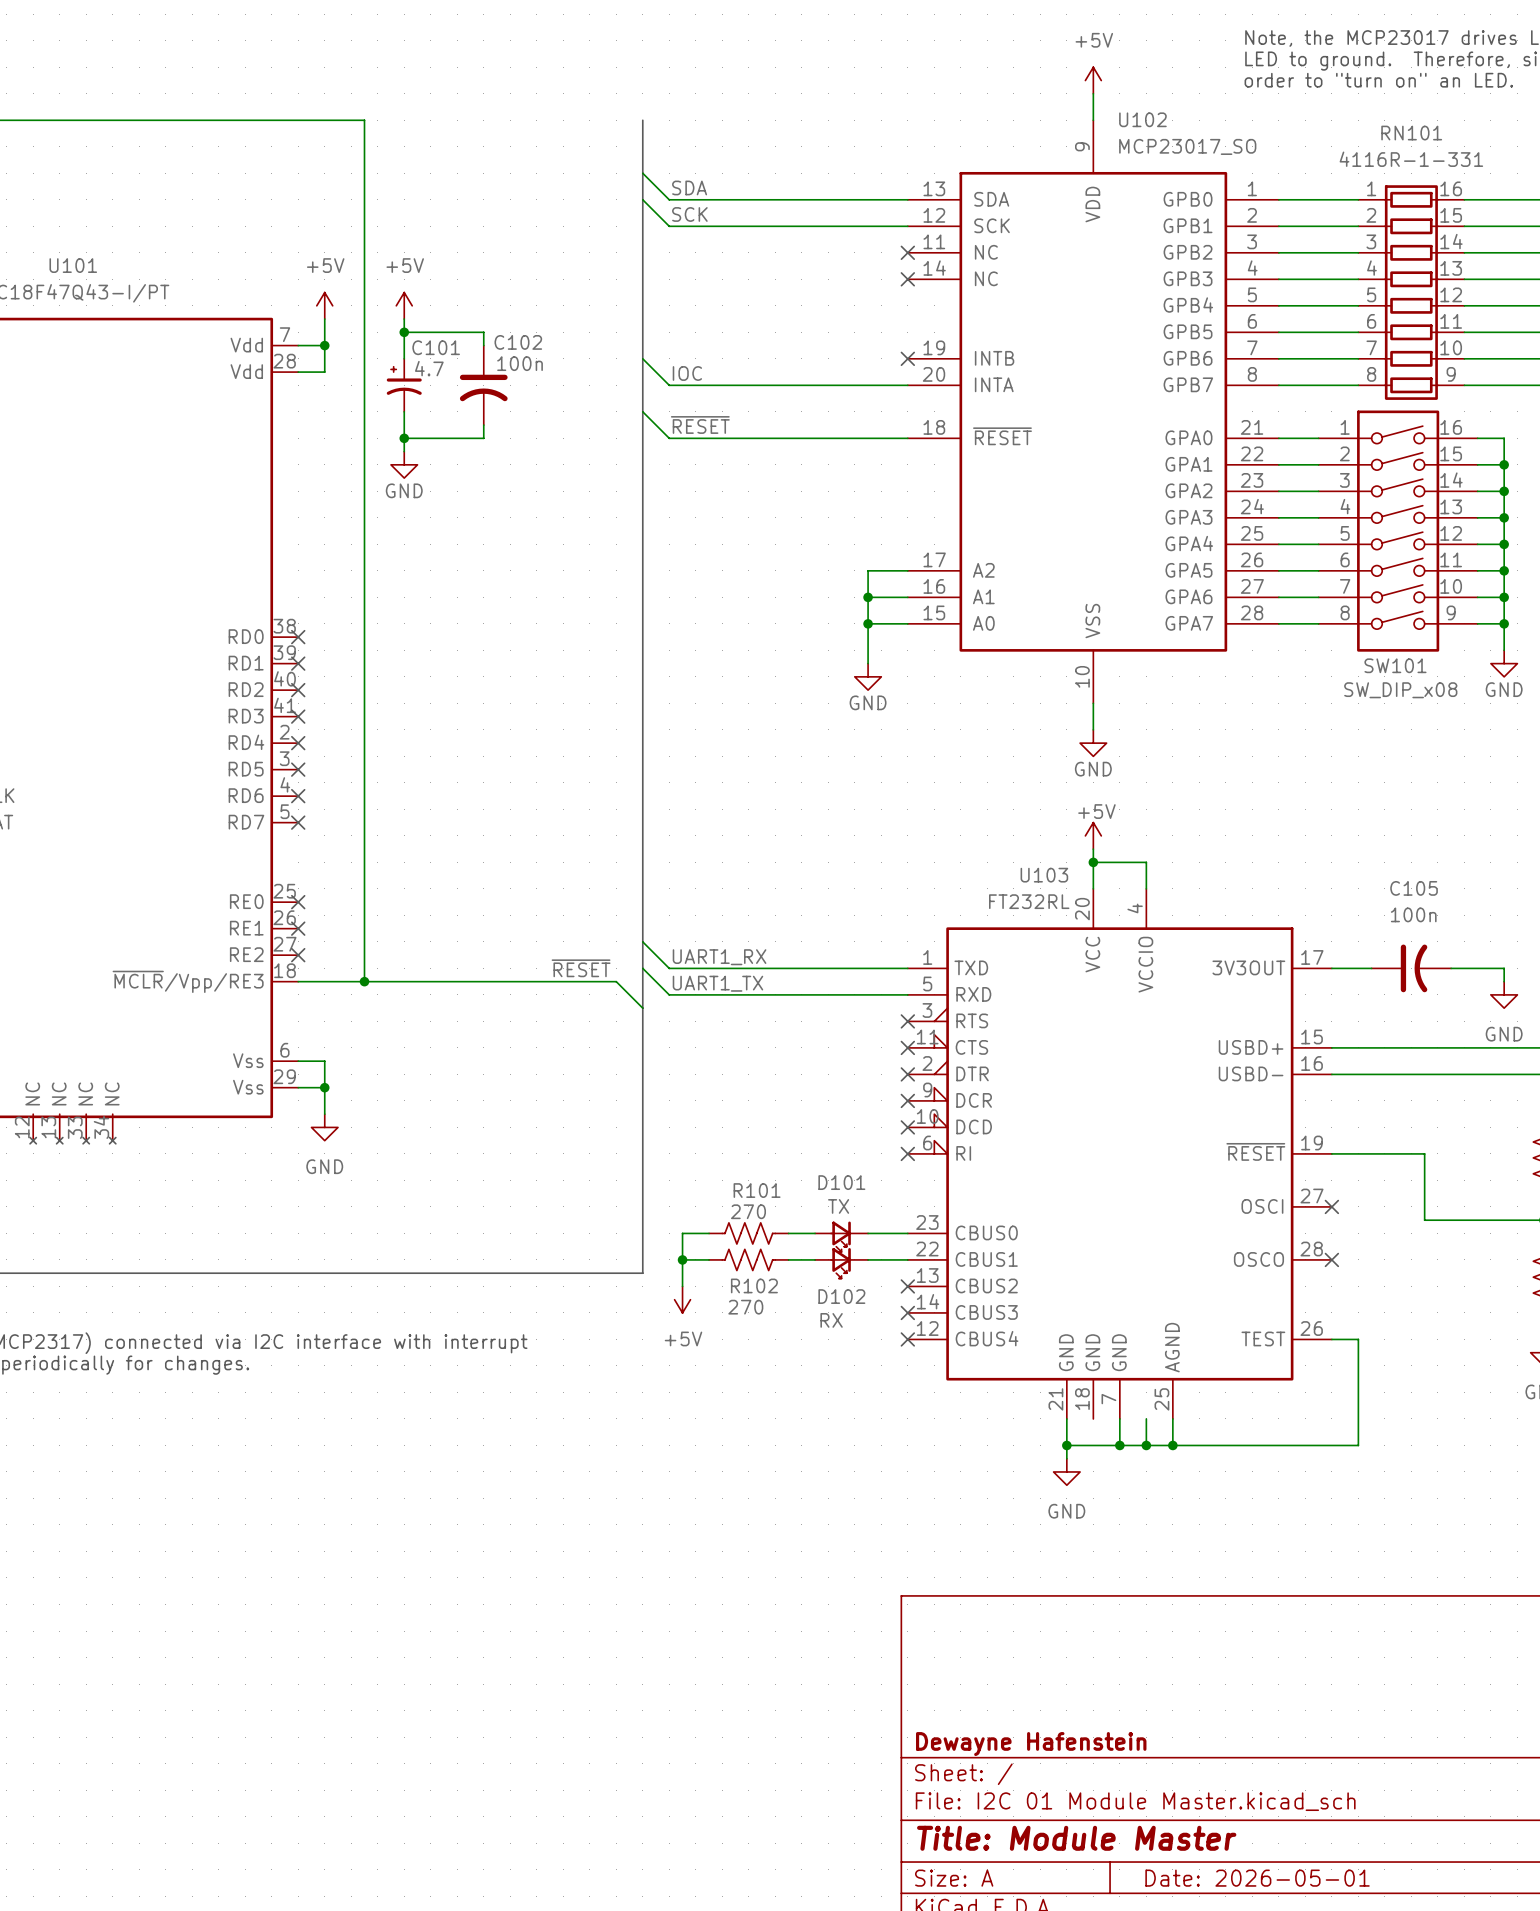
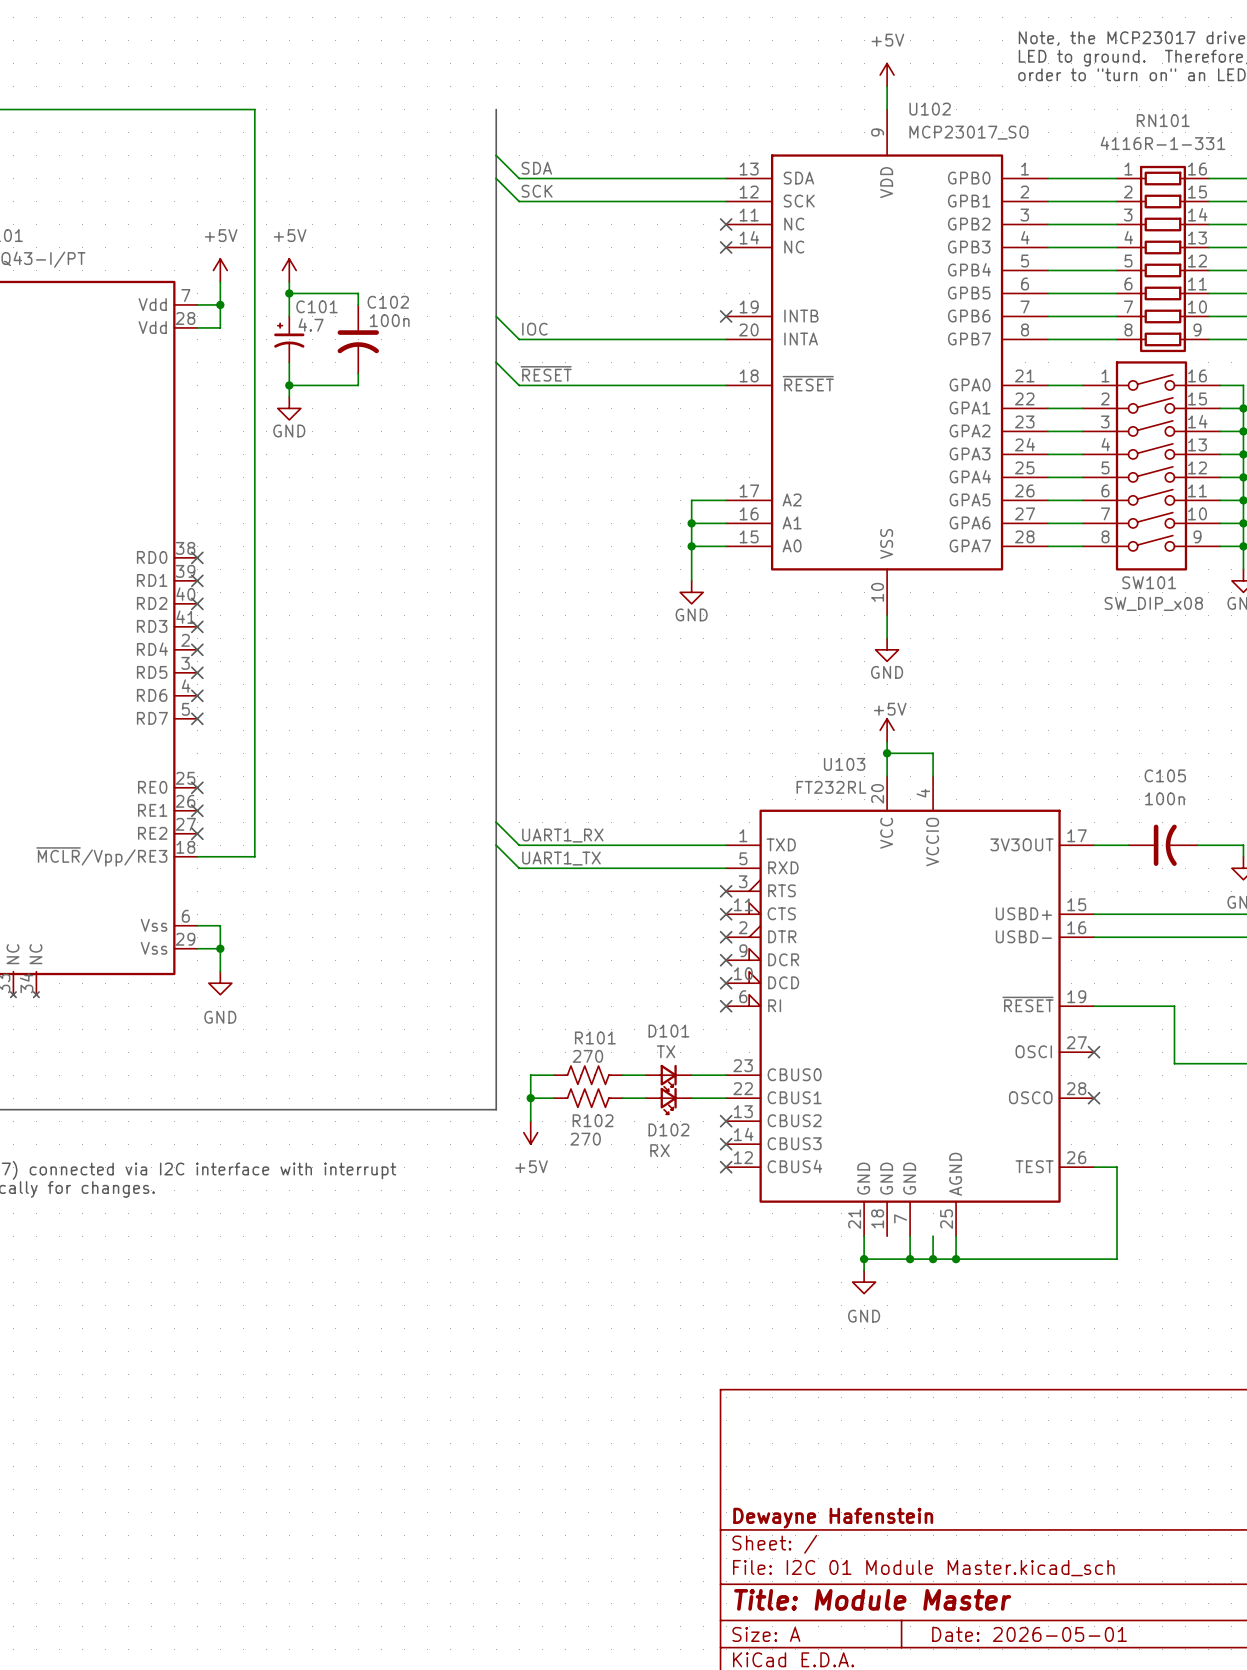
label: ~{RESET} (581, 968) -> none
wire: (364, 981) (616, 981) (642, 1008) -> none
junction: (364, 981) -> none

